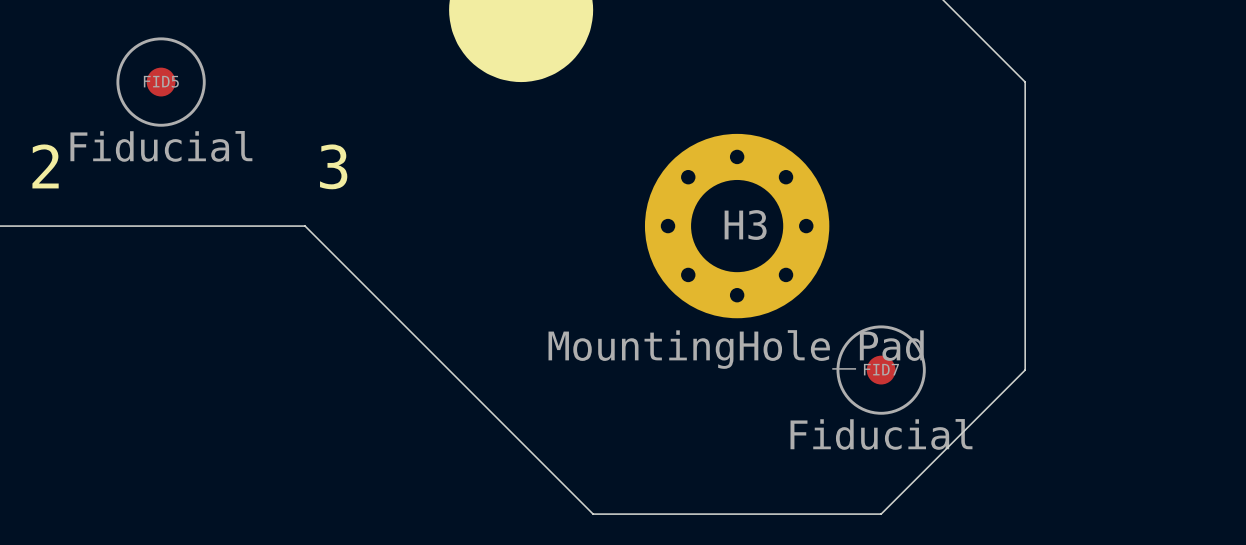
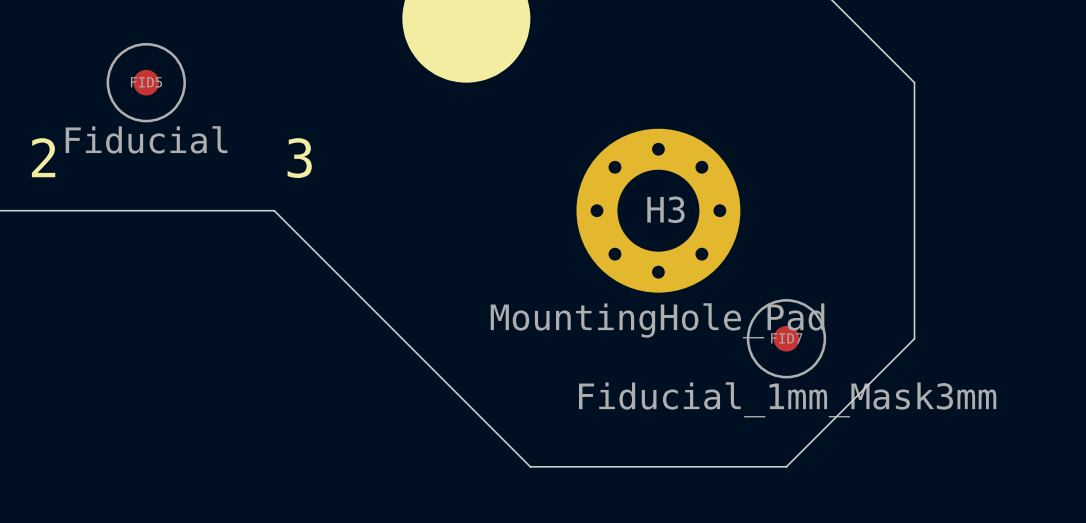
FID7 value: Fiducial (881, 434) -> Fiducial_1mm_Mask3mm (787, 399)

